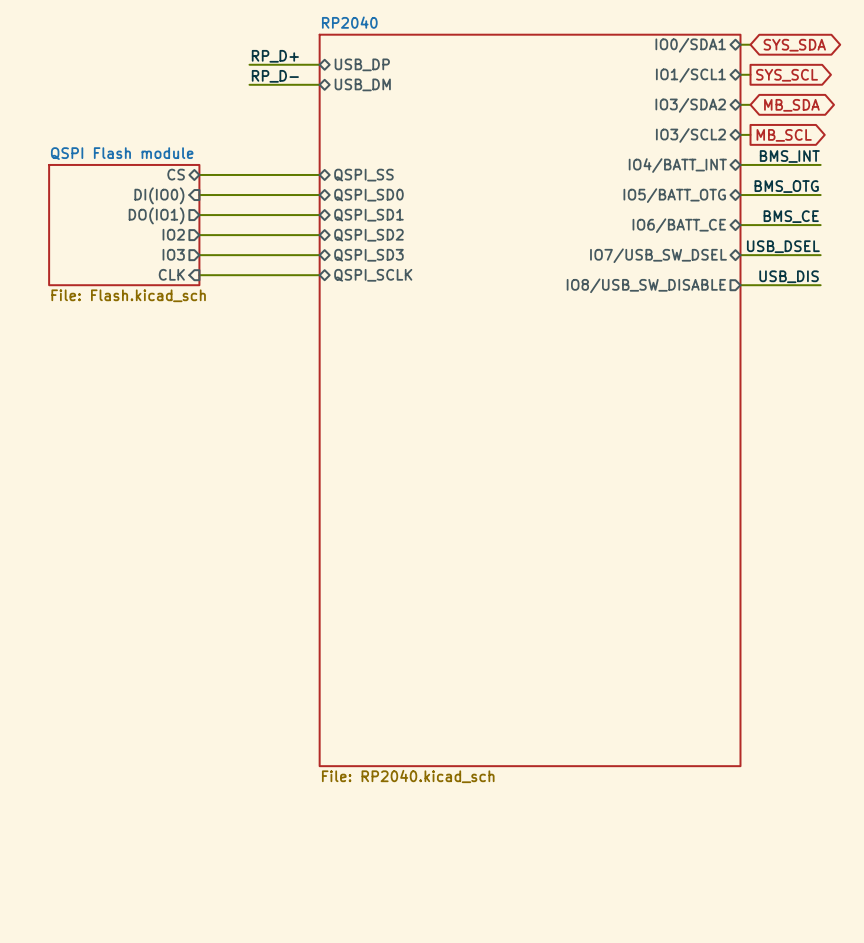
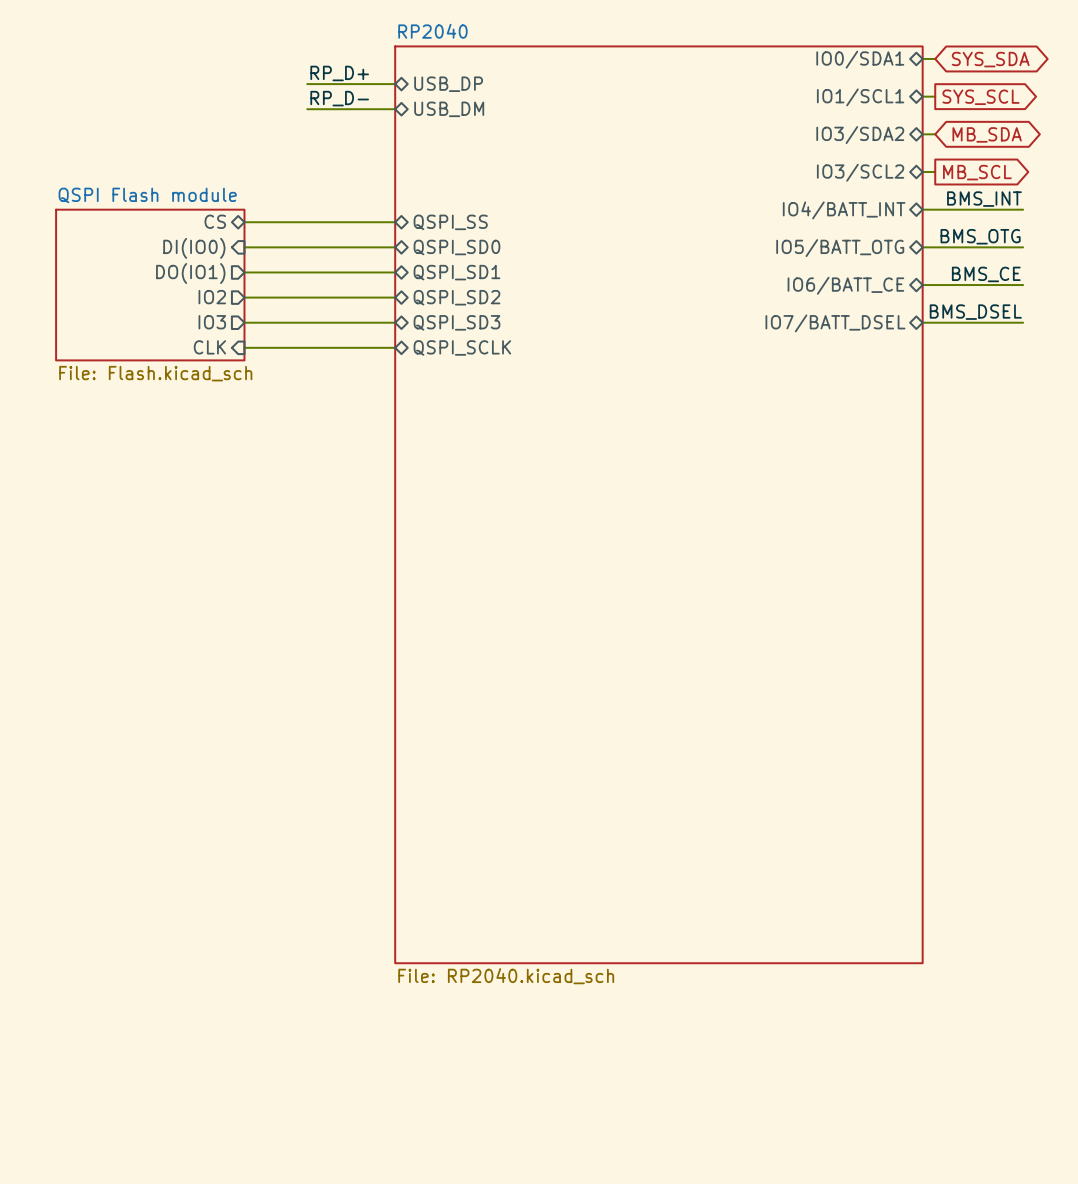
label: USB_DSEL (783, 246) -> BMS_DSEL (975, 312)
sheet pin: IO7/USB_SW_DSEL (658, 255) -> IO7/BATT_DSEL (835, 323)
label: USB_DIS (789, 276) -> none
sheet pin: IO8/USB_SW_DISABLE (646, 285) -> none
wire: (740, 285) (820, 285) -> none

